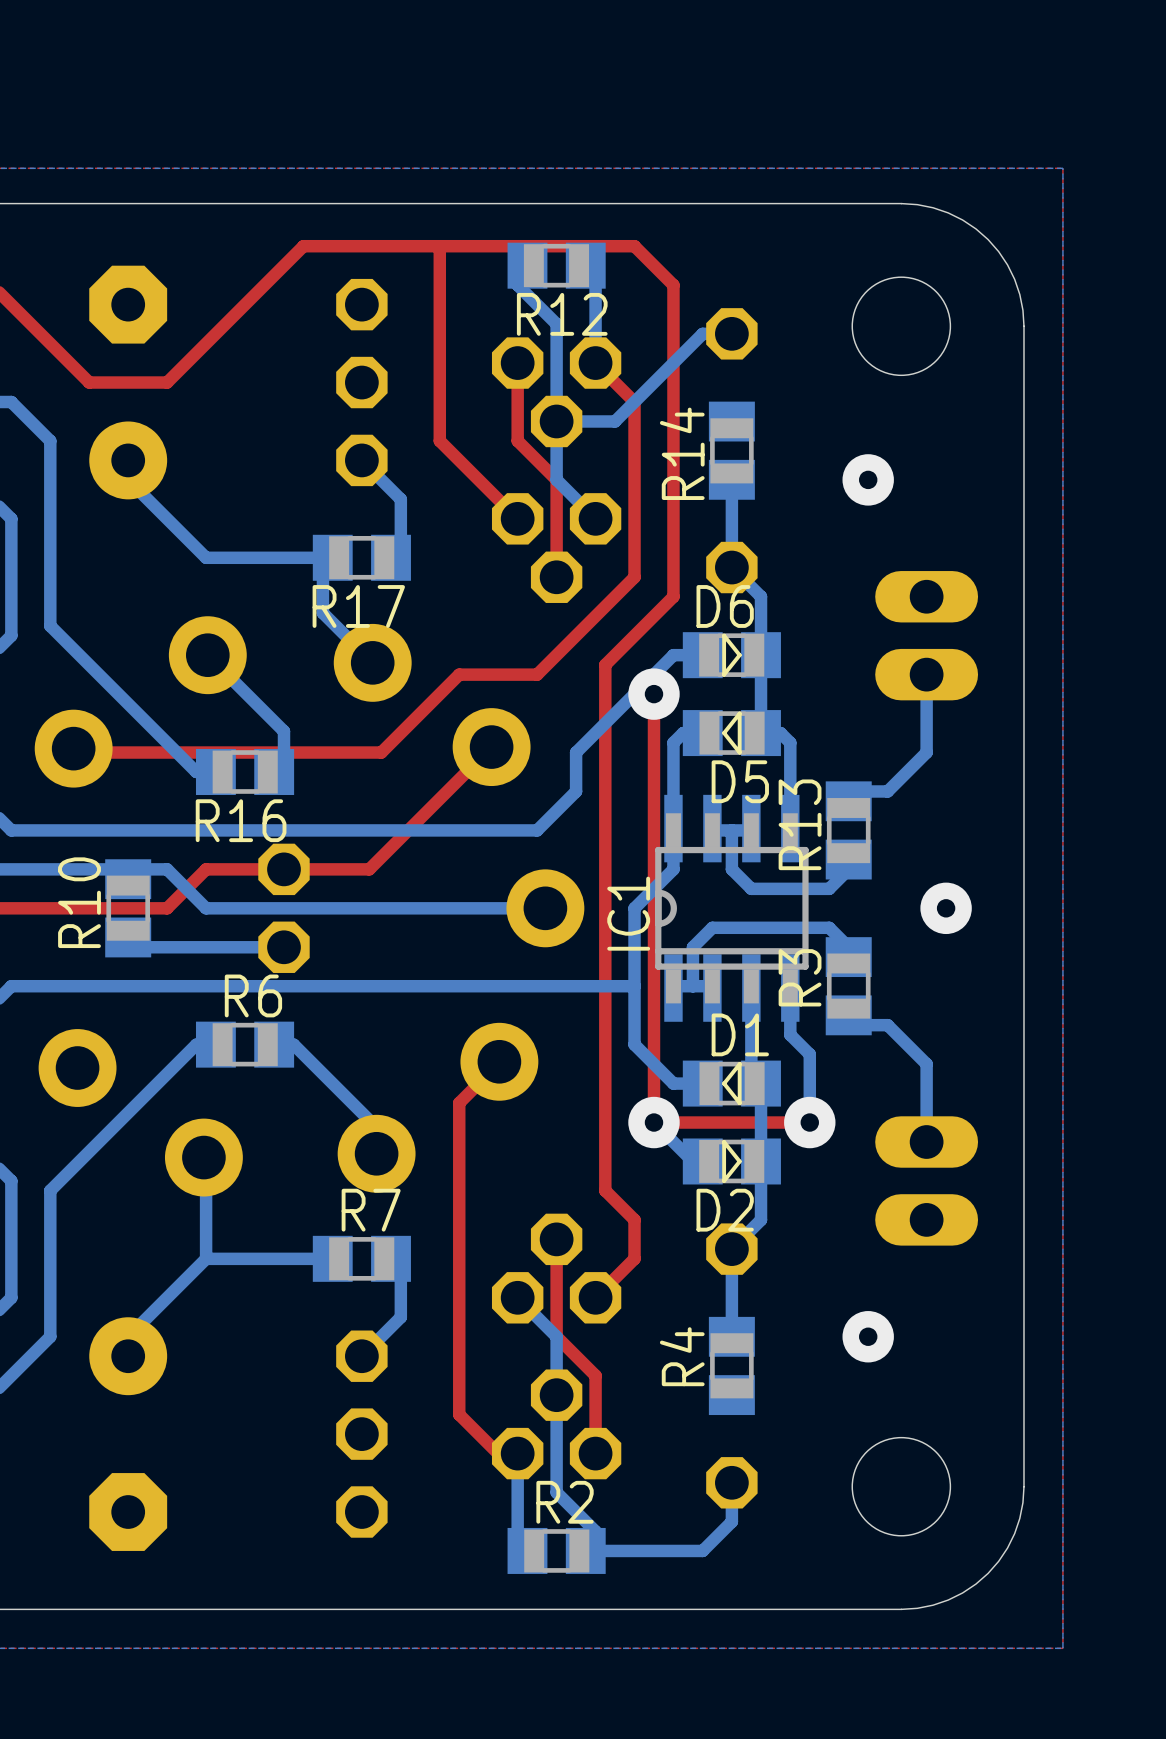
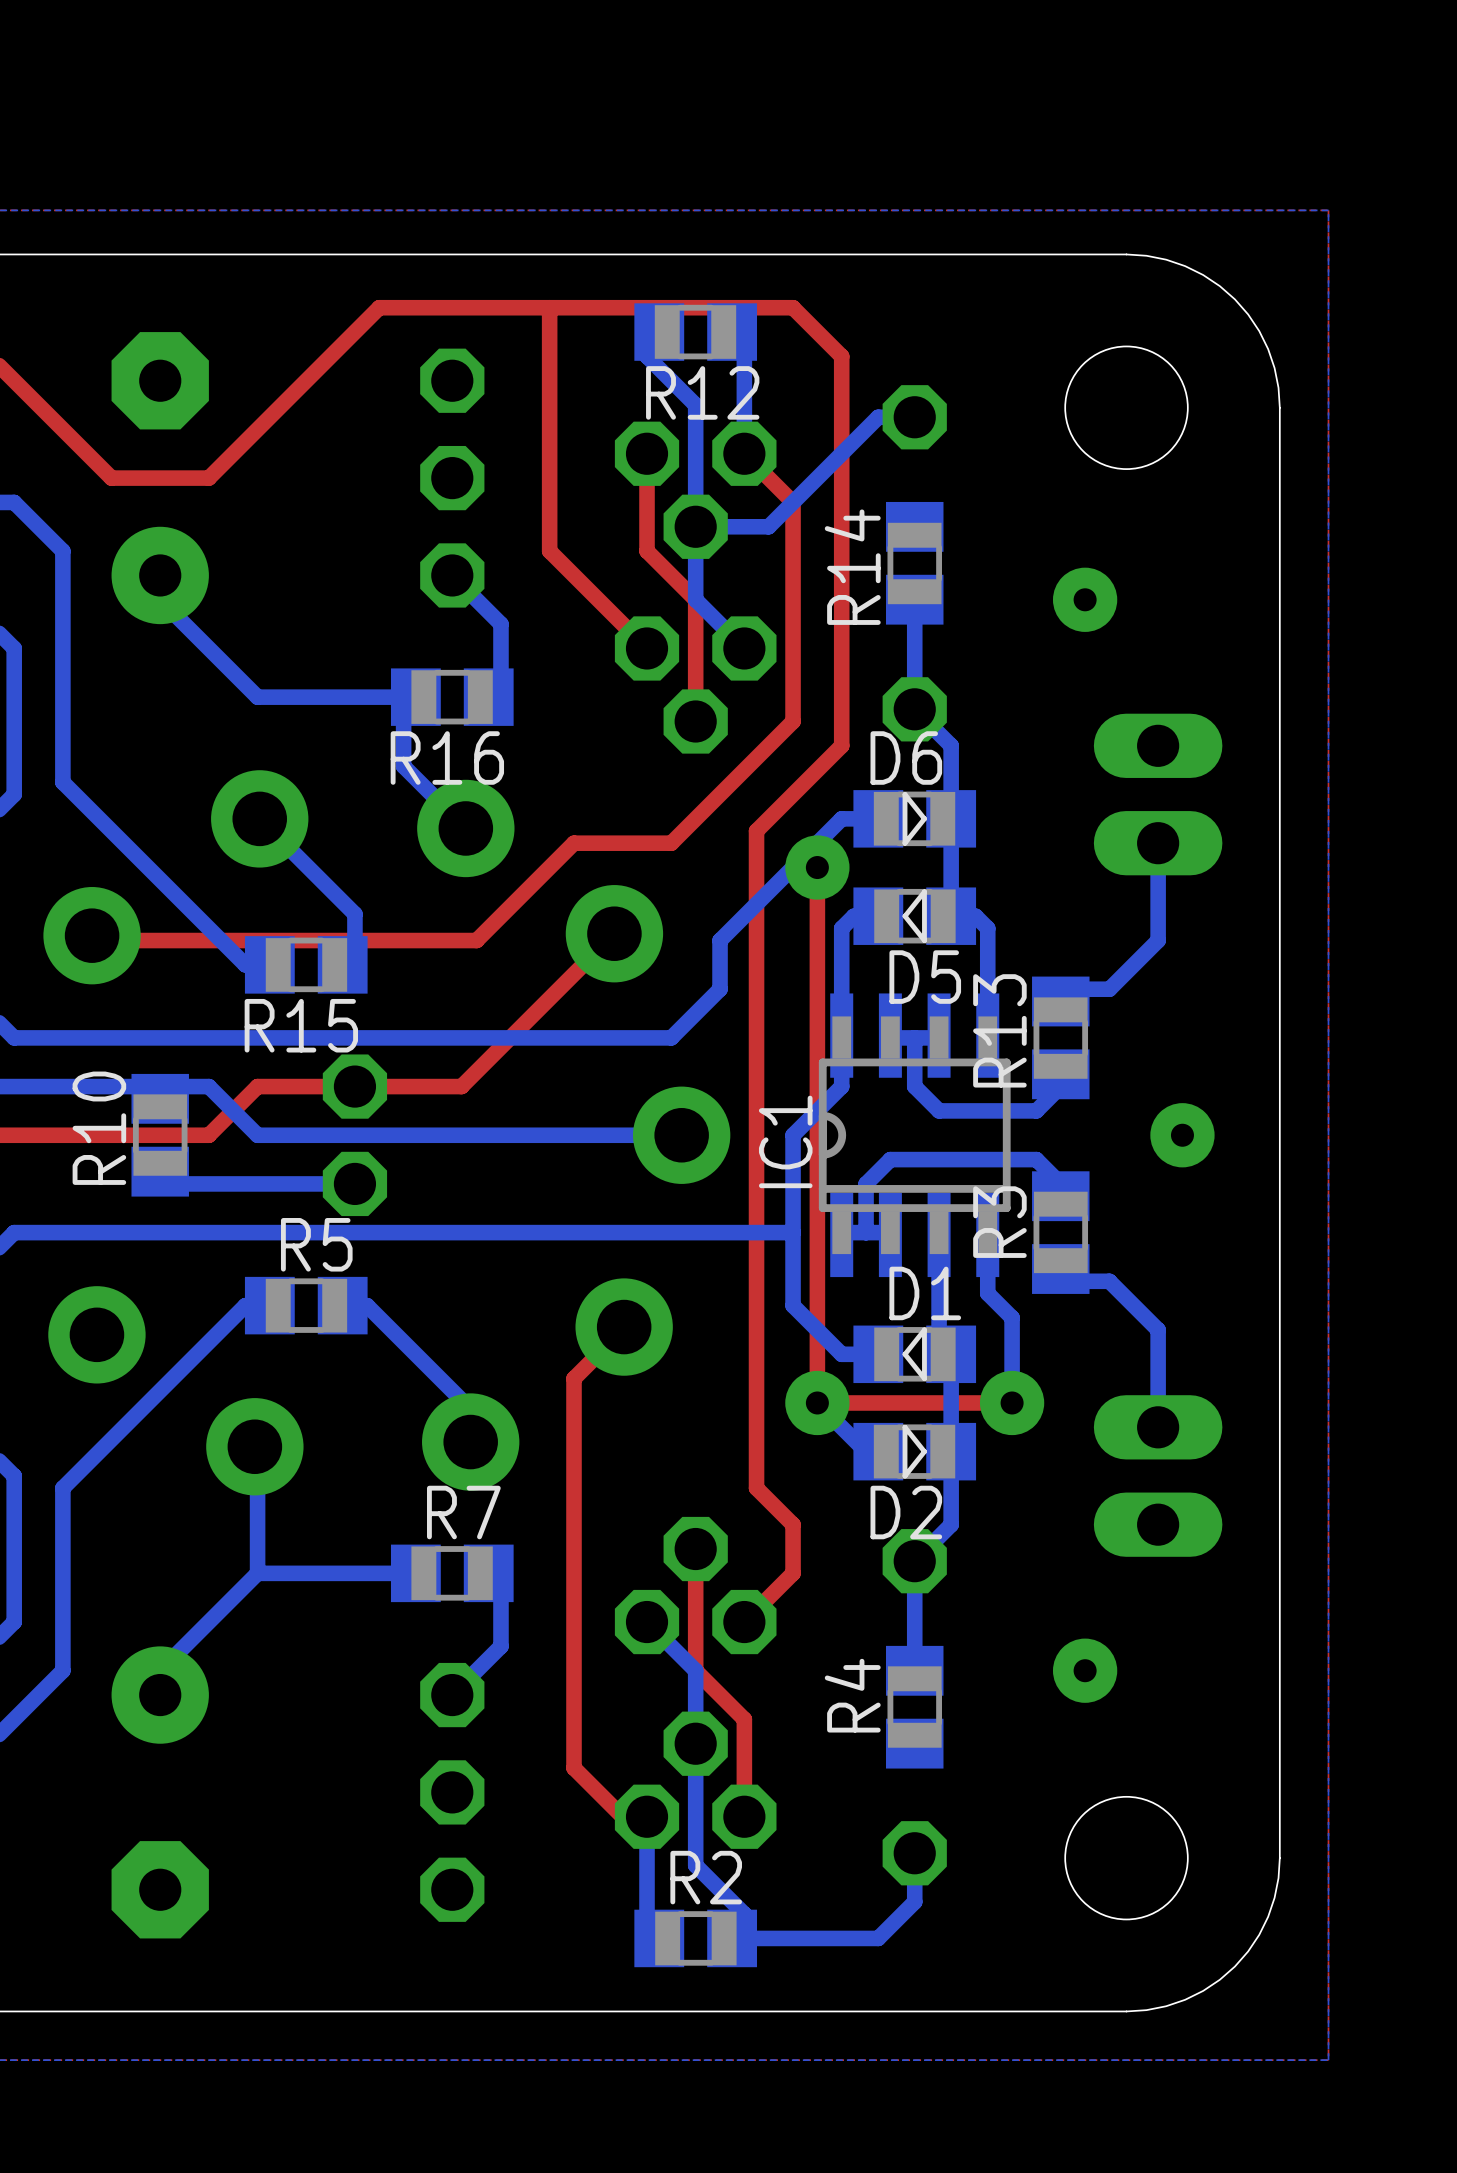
R17 name: R17 (358, 606) -> R16 (447, 758)
R16 name: R16 (241, 820) -> R15 (301, 1025)
R6 name: R6 (253, 995) -> R5 (316, 1244)

